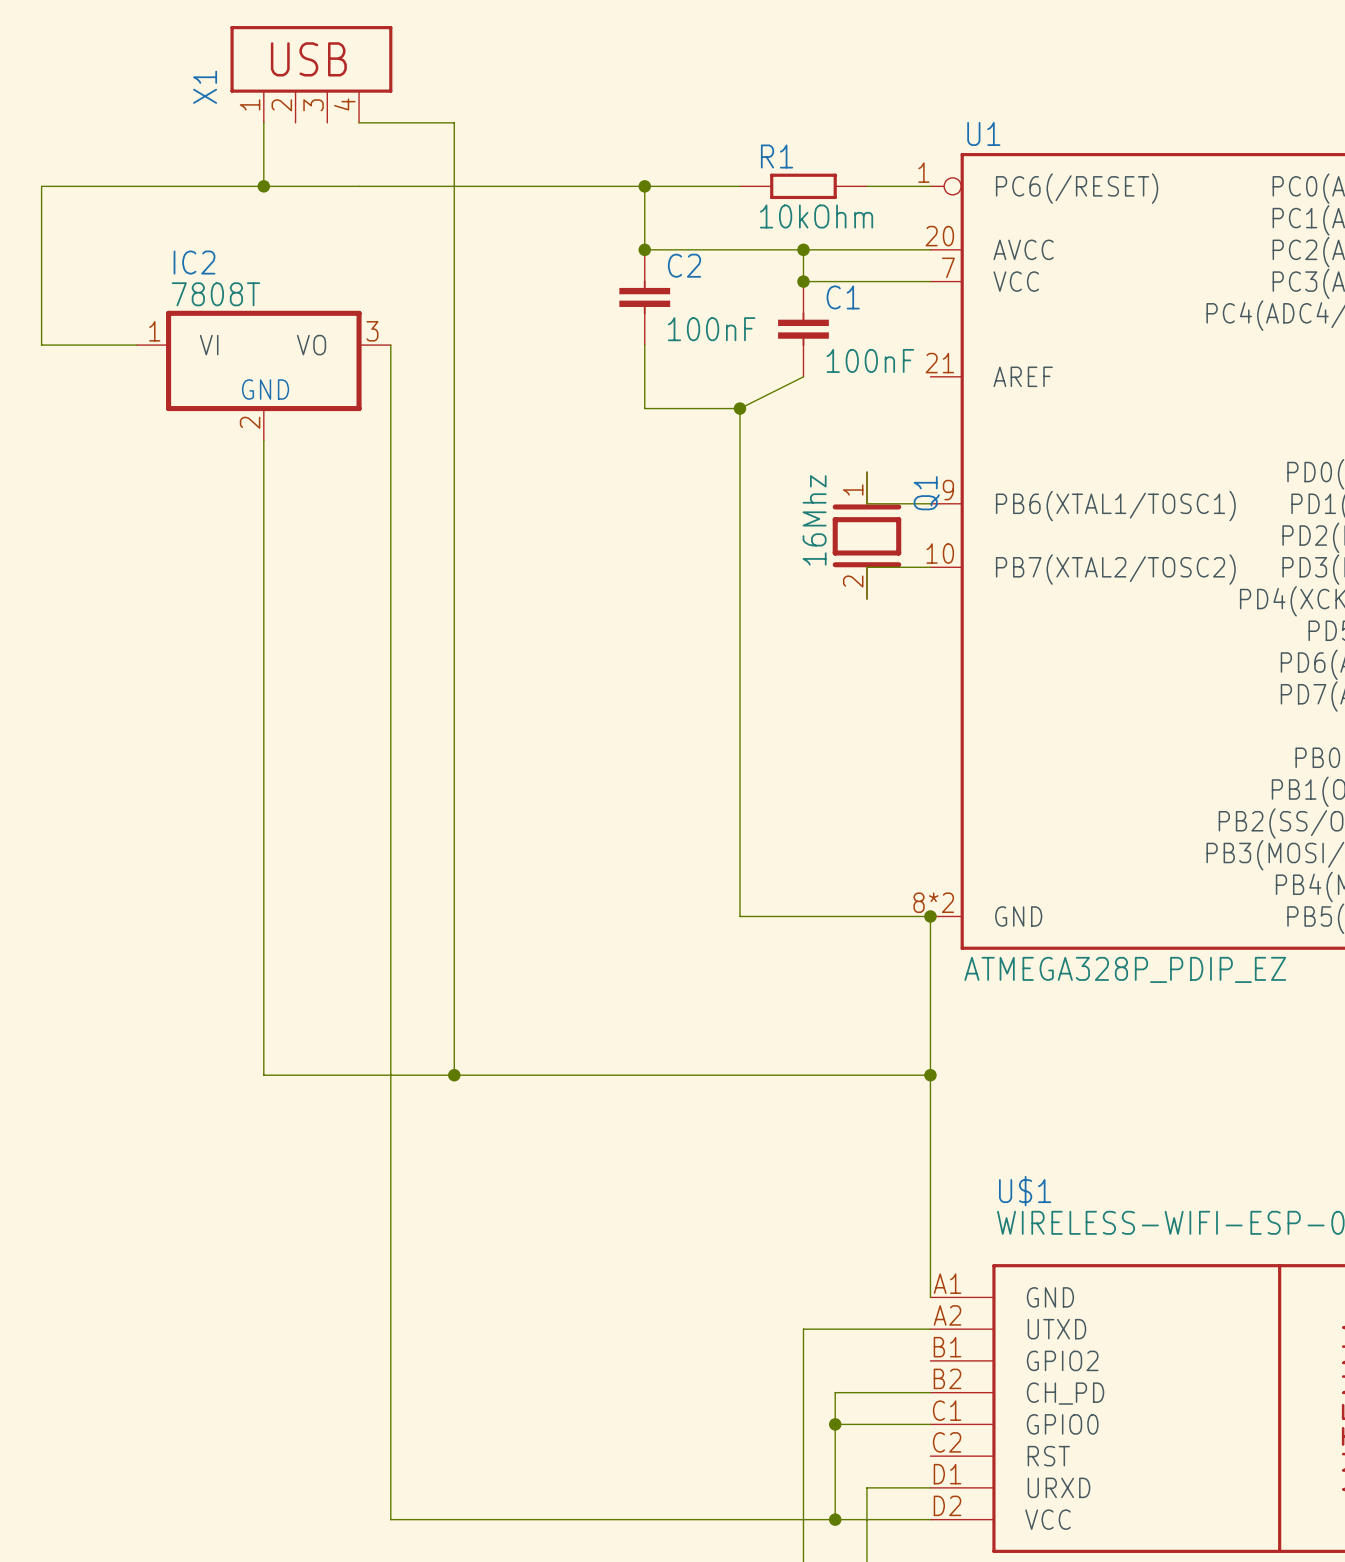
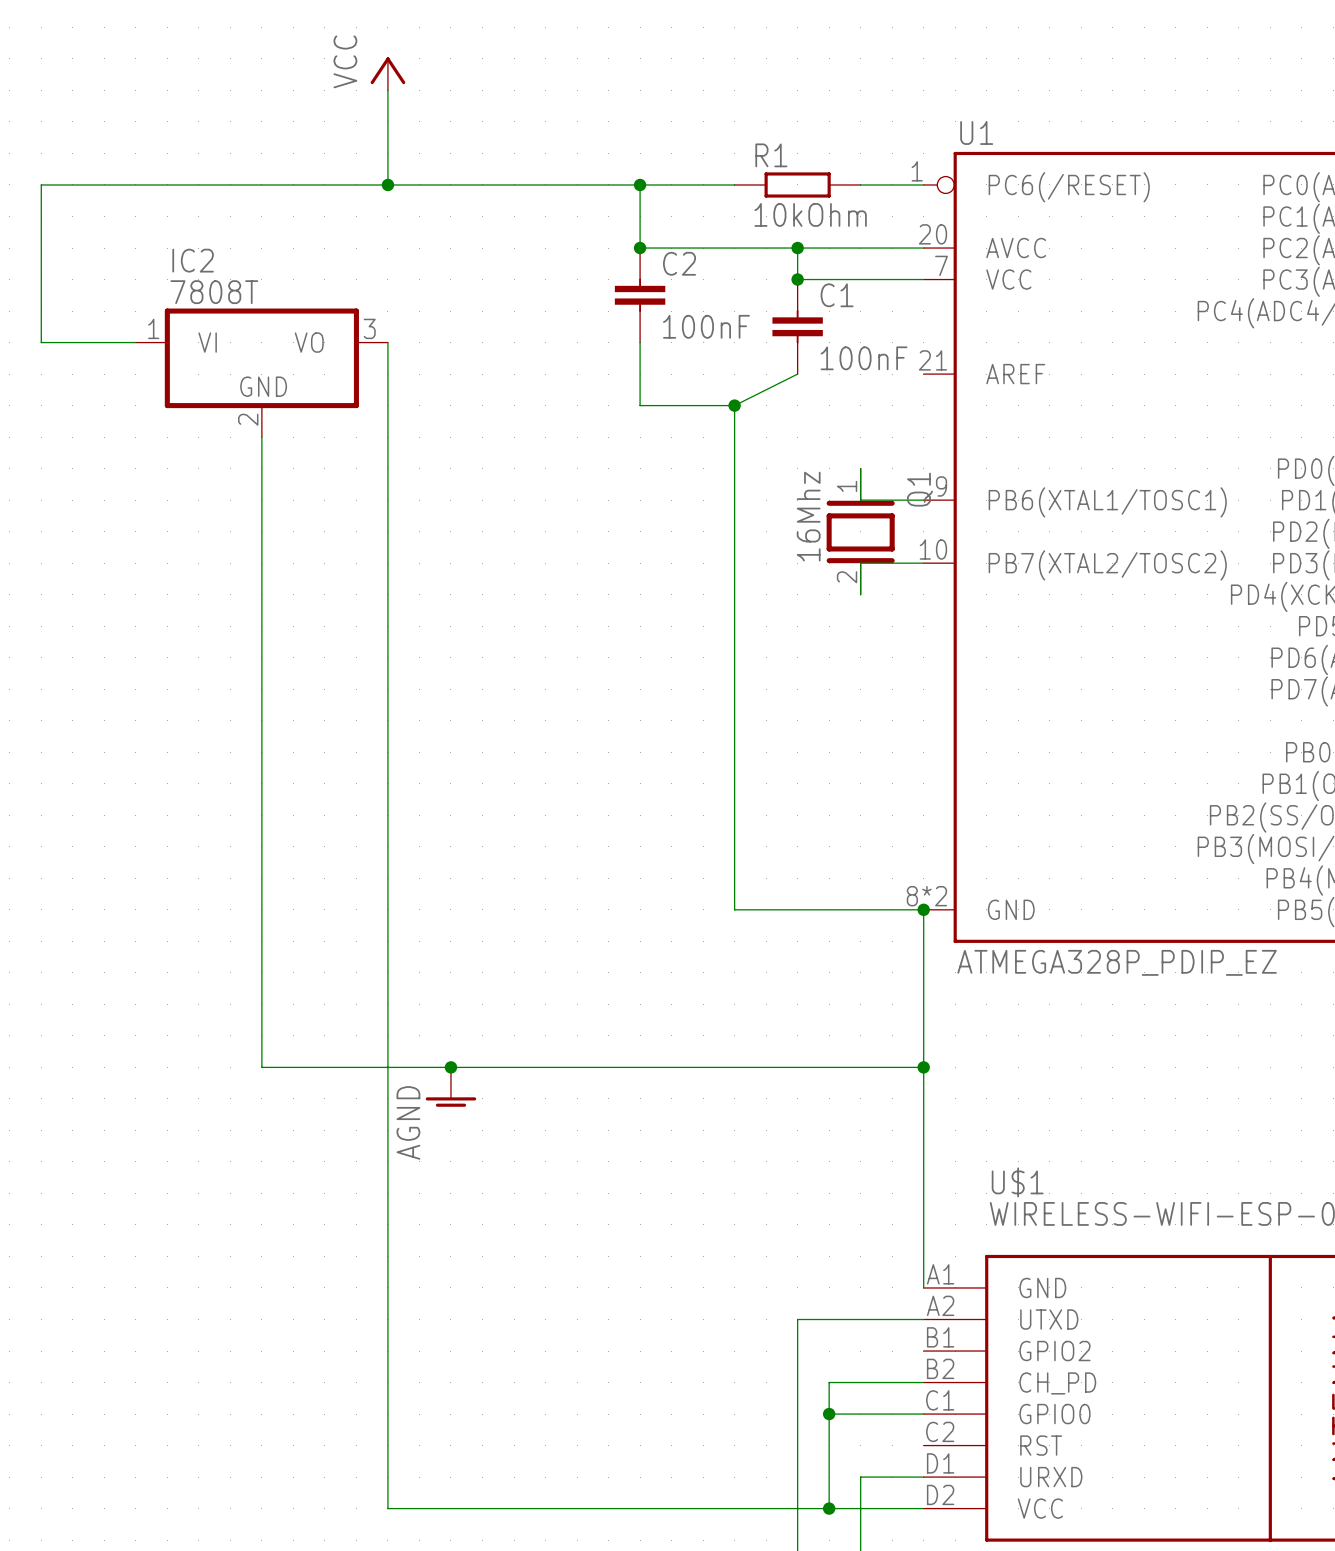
X1: (311, 74) -> none
power symbol: none -> VCC (387, 73)
wire: none -> (387, 90) (387, 184)
wire: (263, 122) (263, 186) -> none
wire: (359, 122) (454, 122) (454, 1075) -> none
junction: (263, 186) -> none
junction: none -> (387, 184)
power symbol: none -> AGND (450, 1087)

